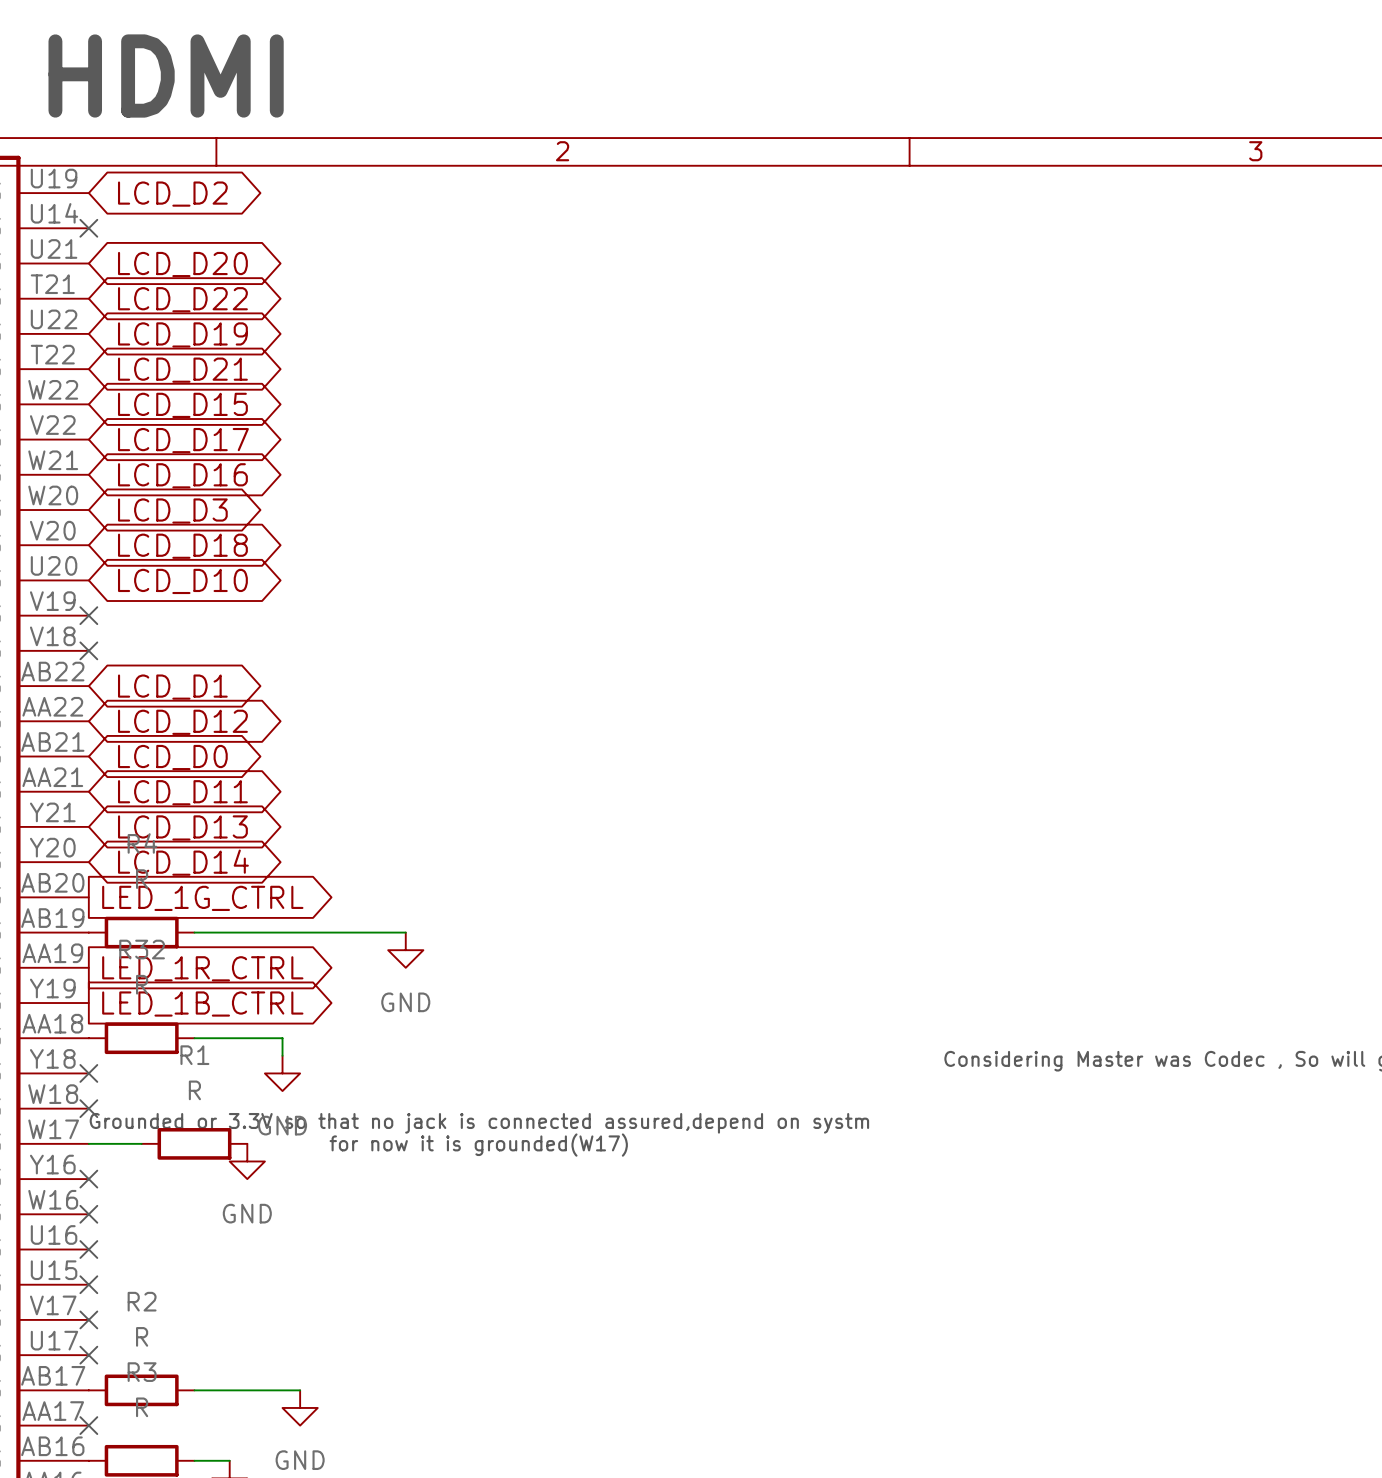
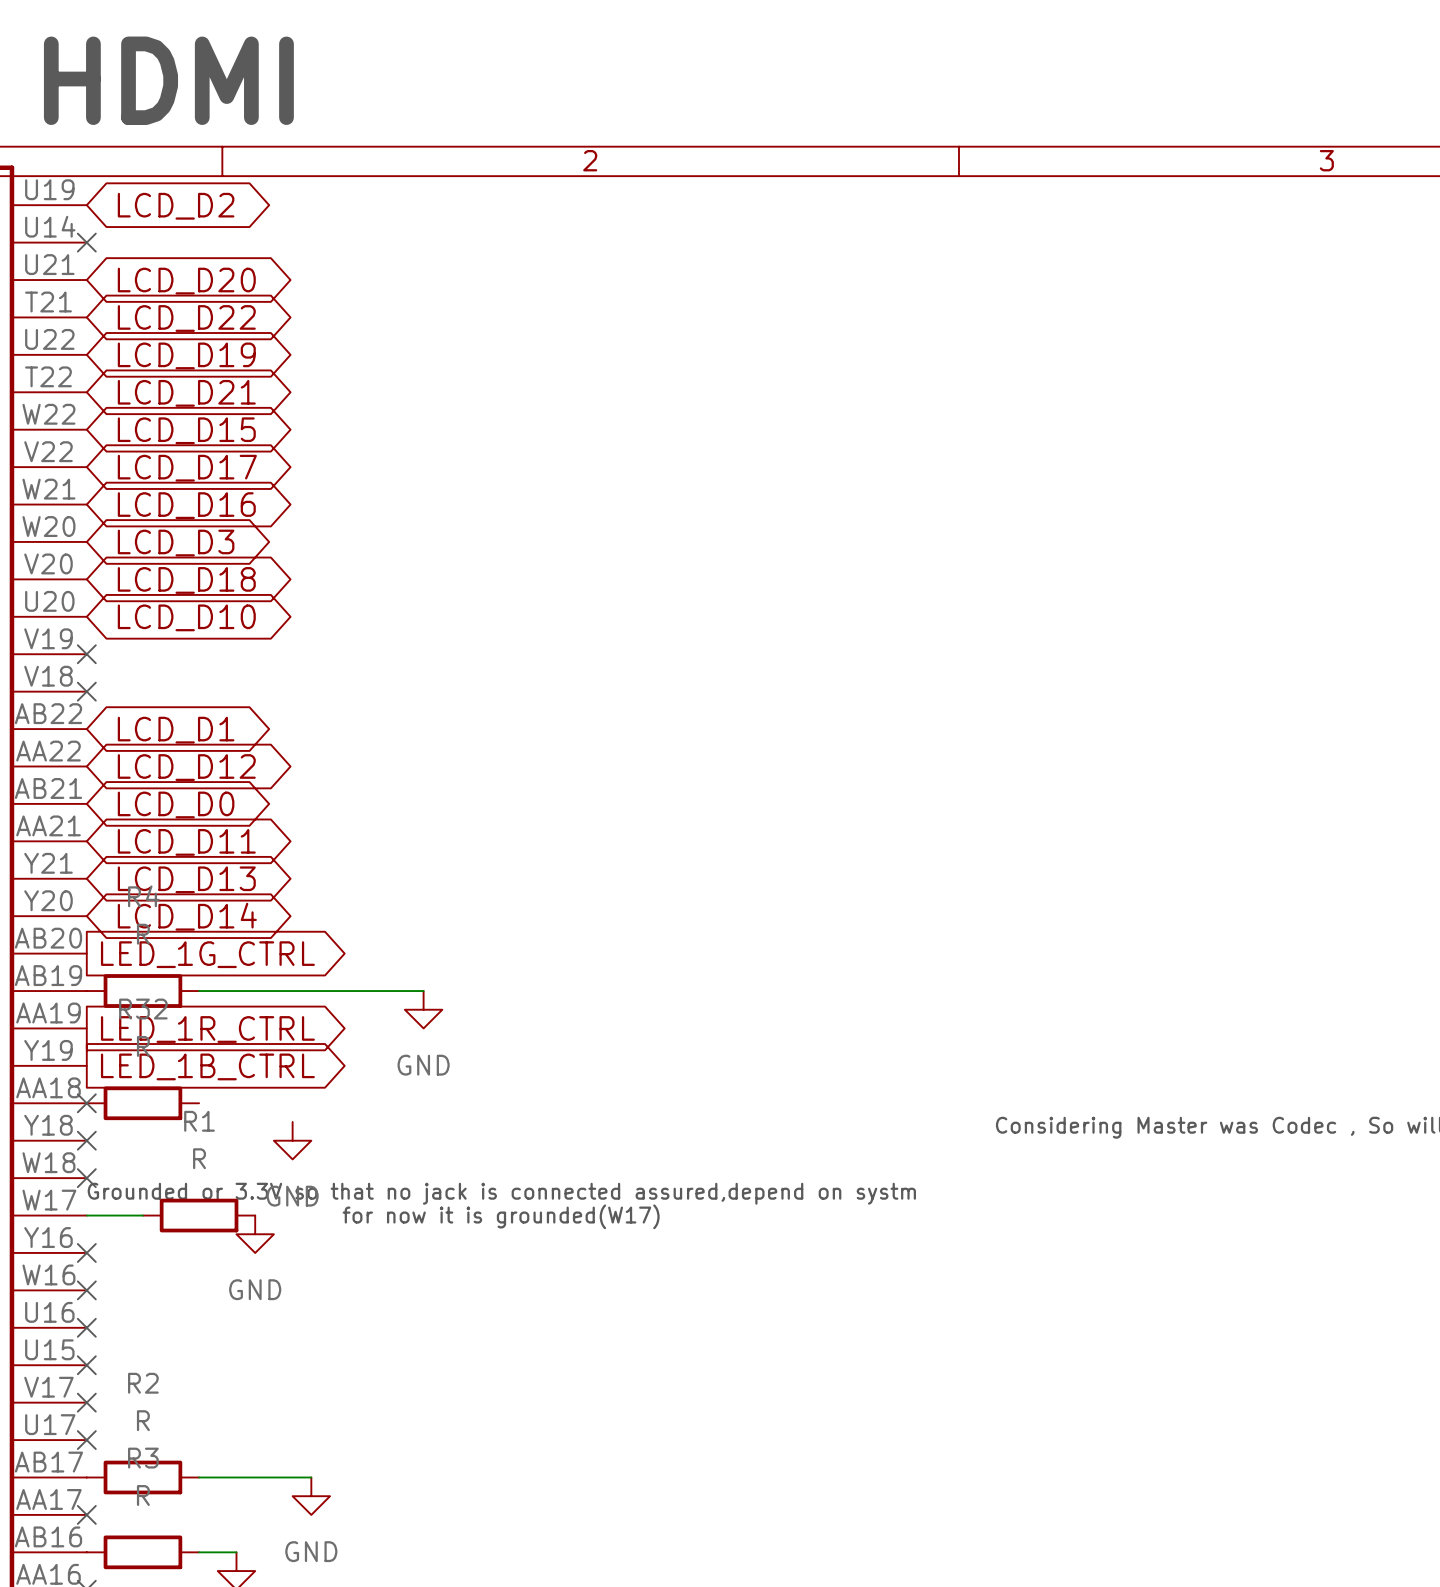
no-connect mark: none -> (86, 1103)
wire: (194, 1038) (282, 1038) (282, 1055) -> none

